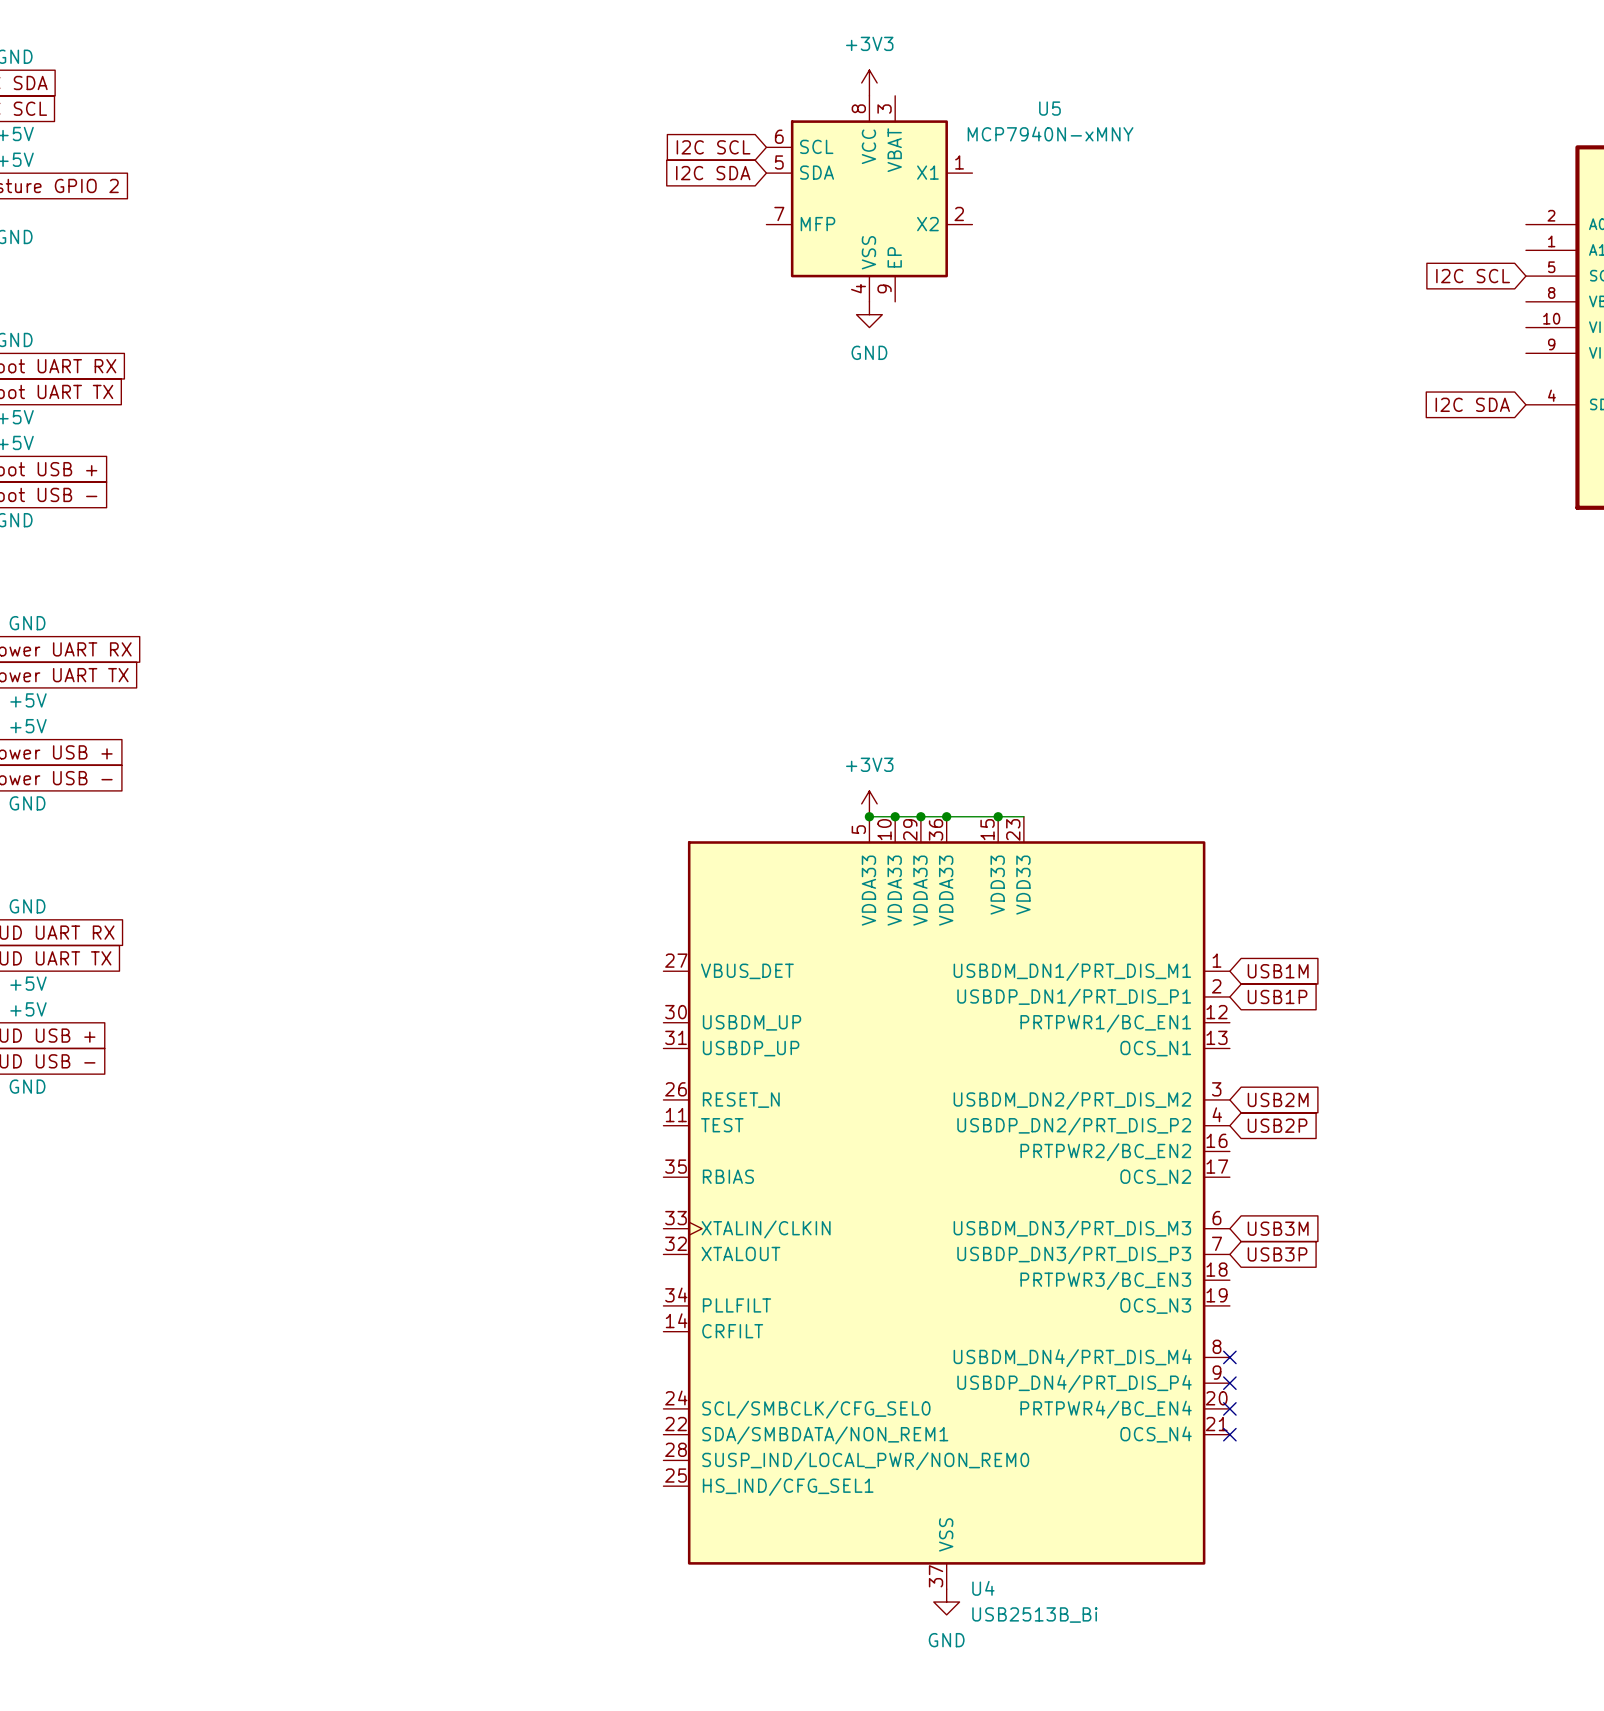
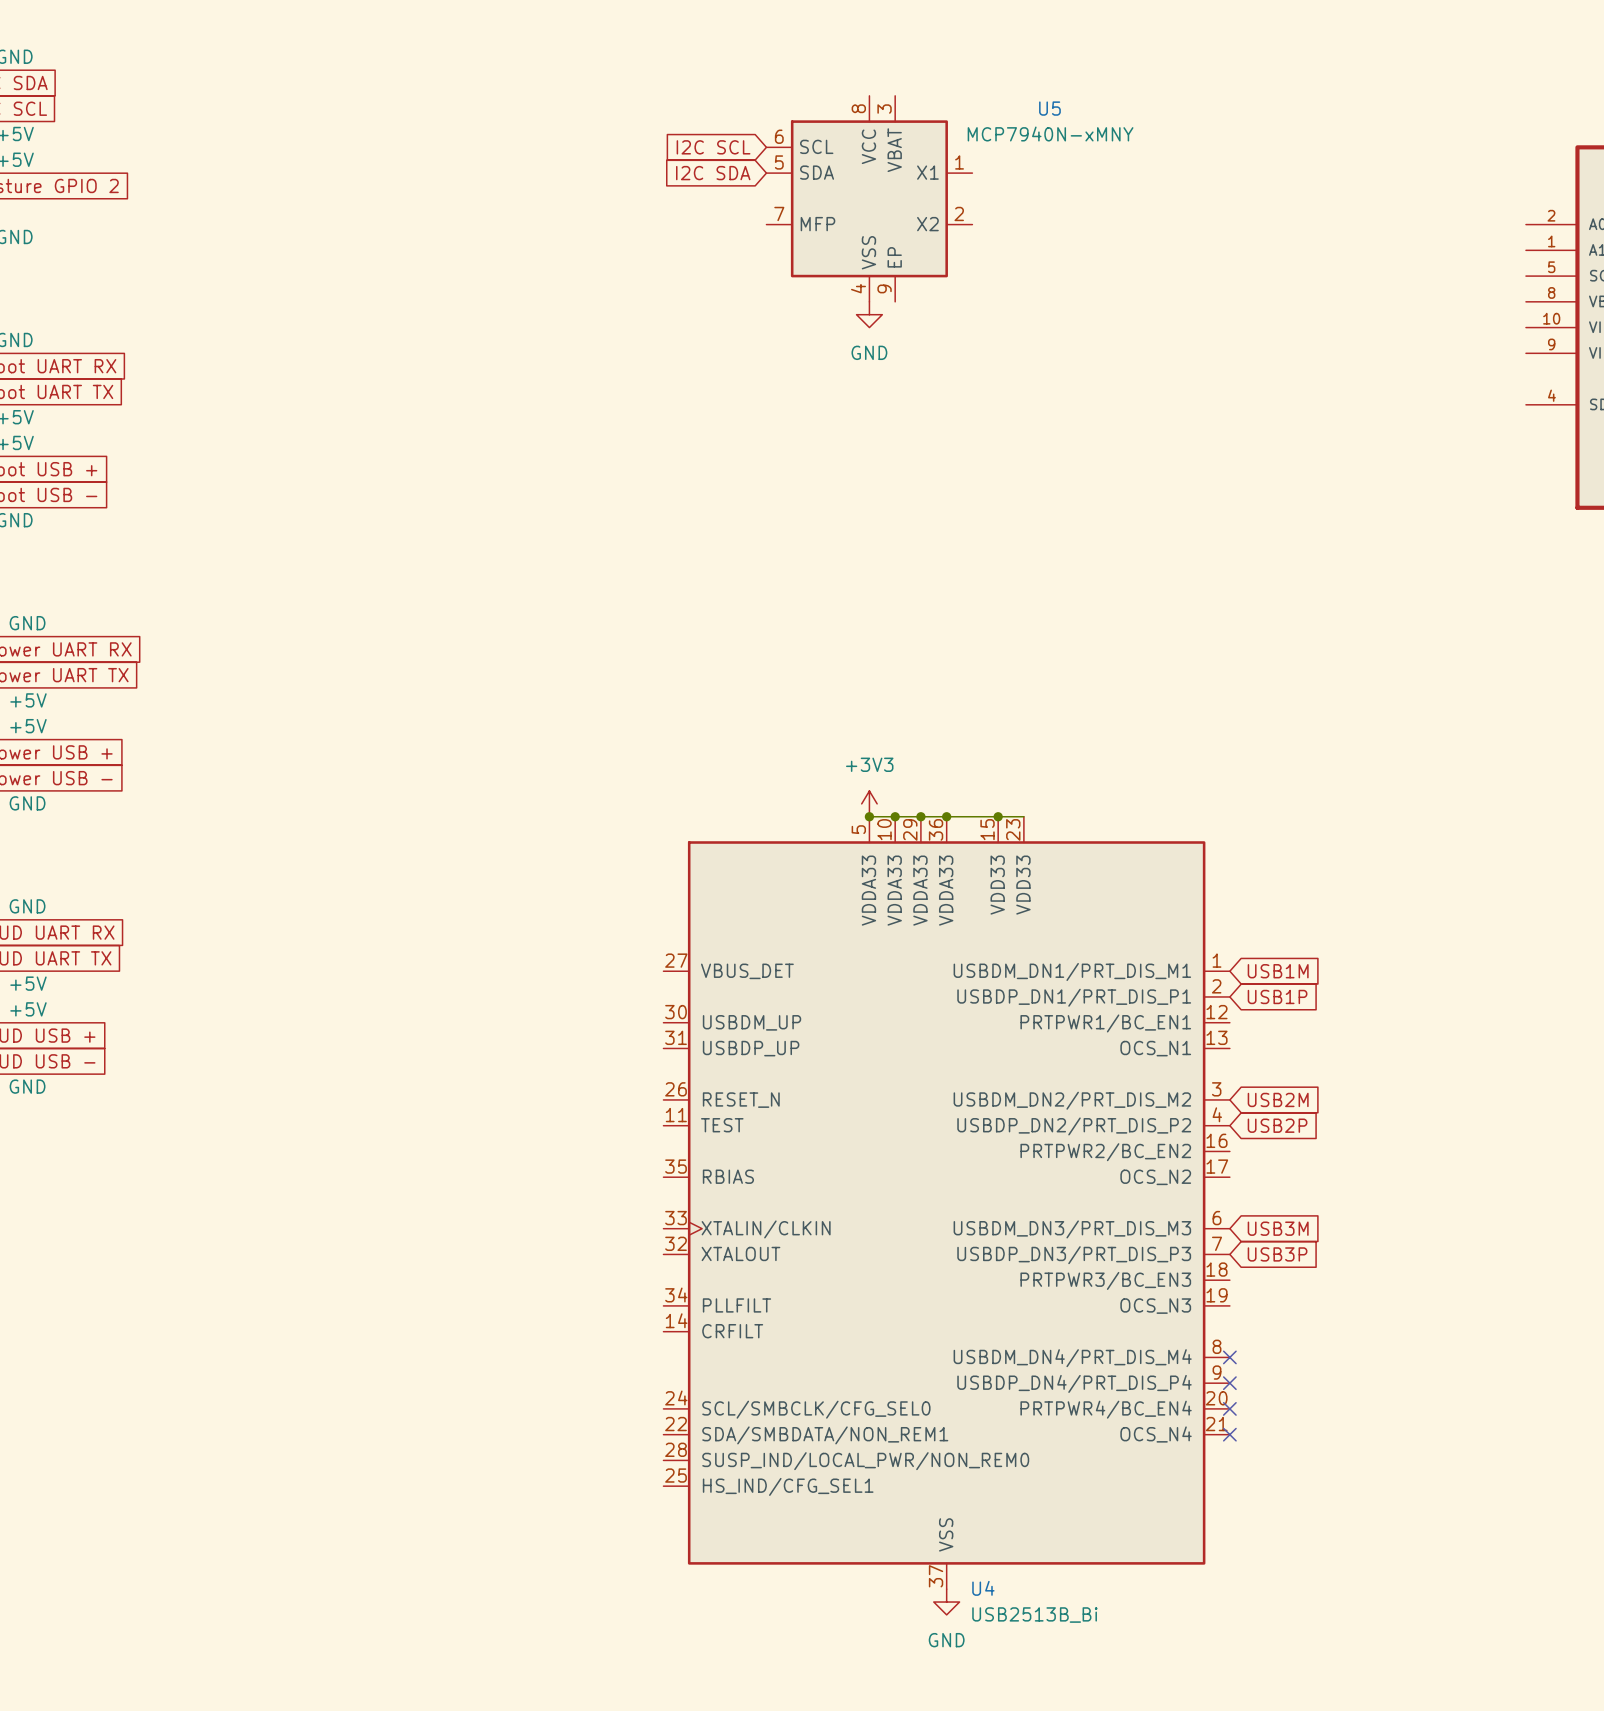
power symbol: +3V3 (869, 82) -> none
global label: I2C SCL (1473, 276) -> none
global label: I2C SDA (1472, 404) -> none

